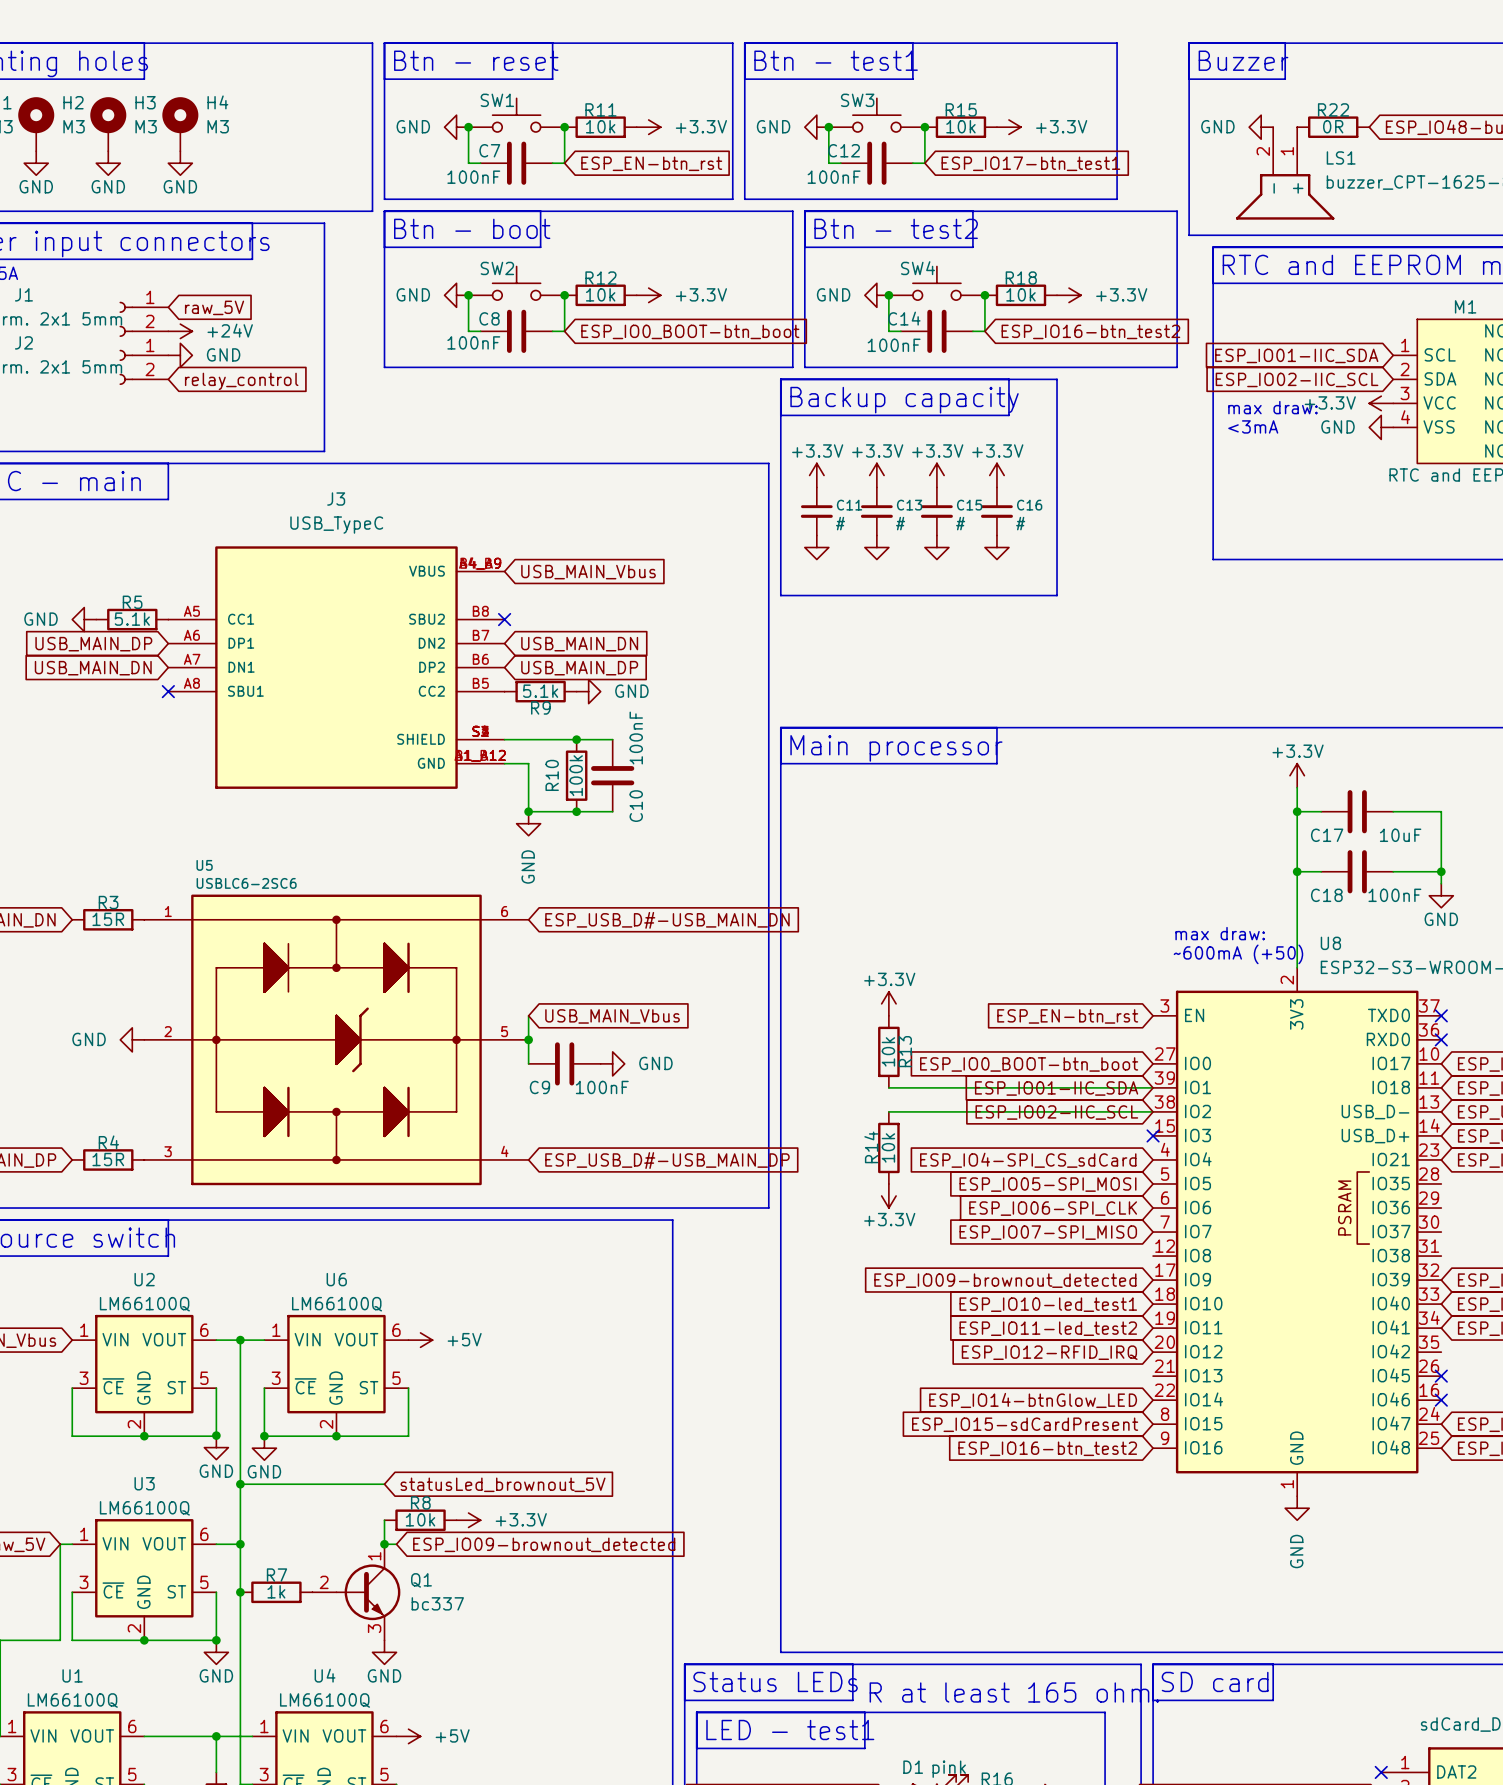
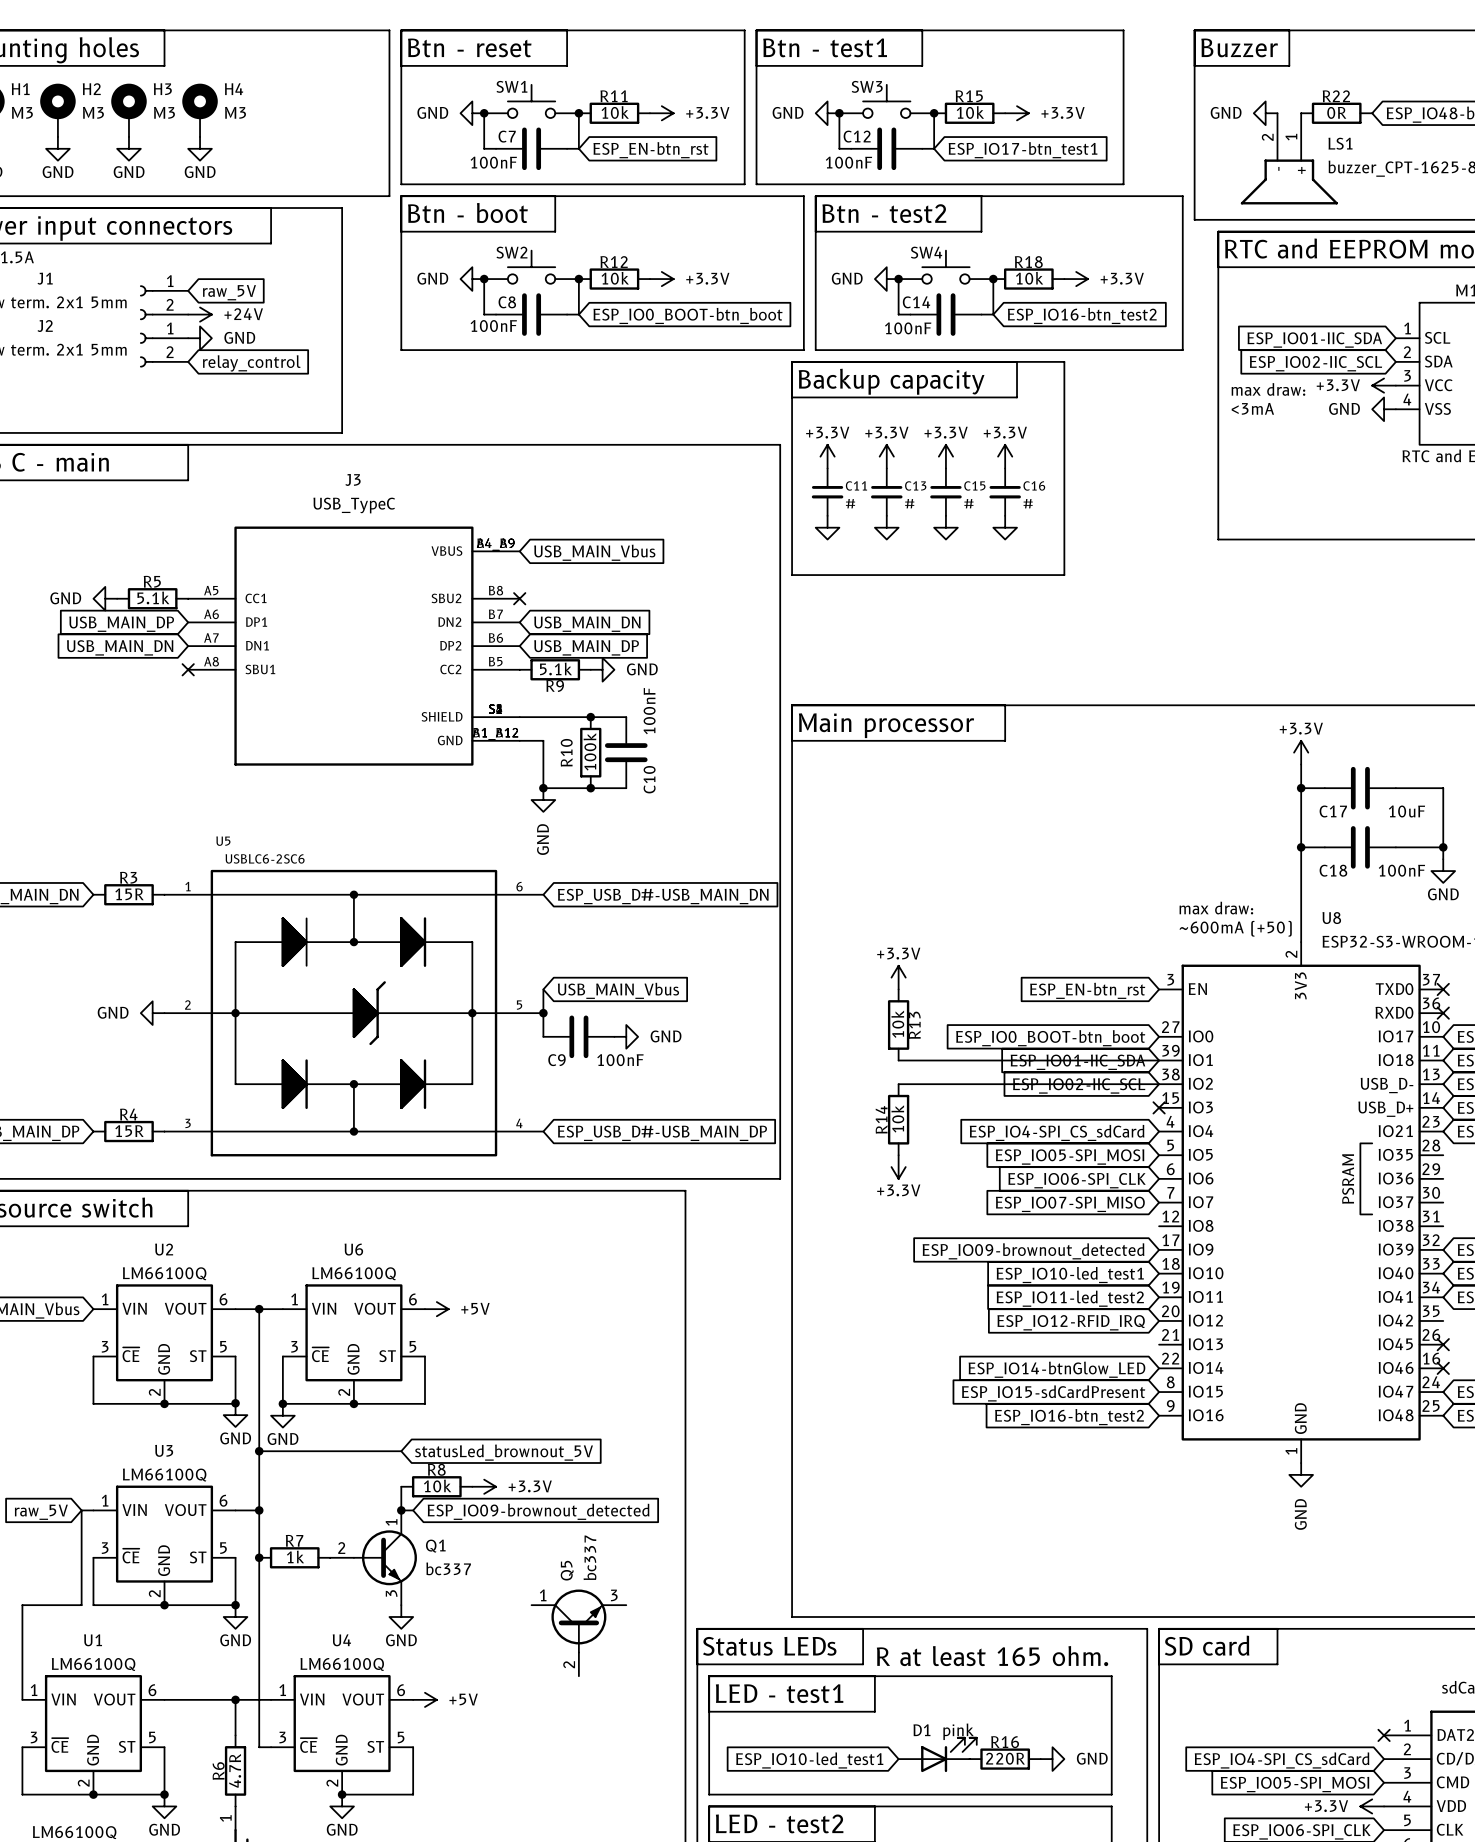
Q5: none -> bc337 (578, 1632)

